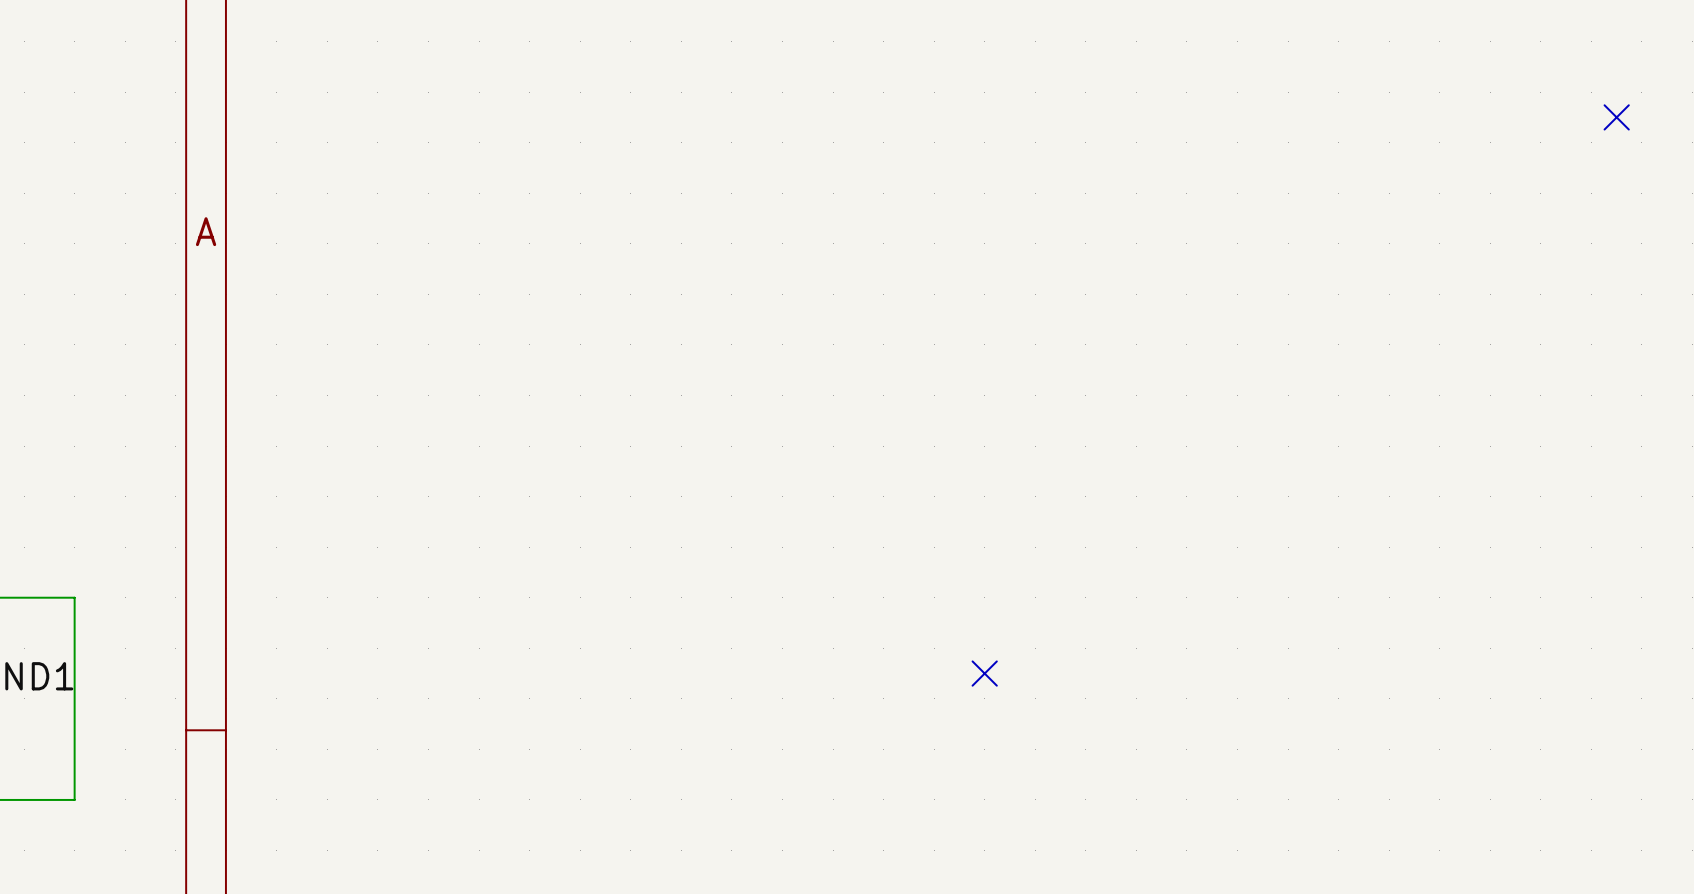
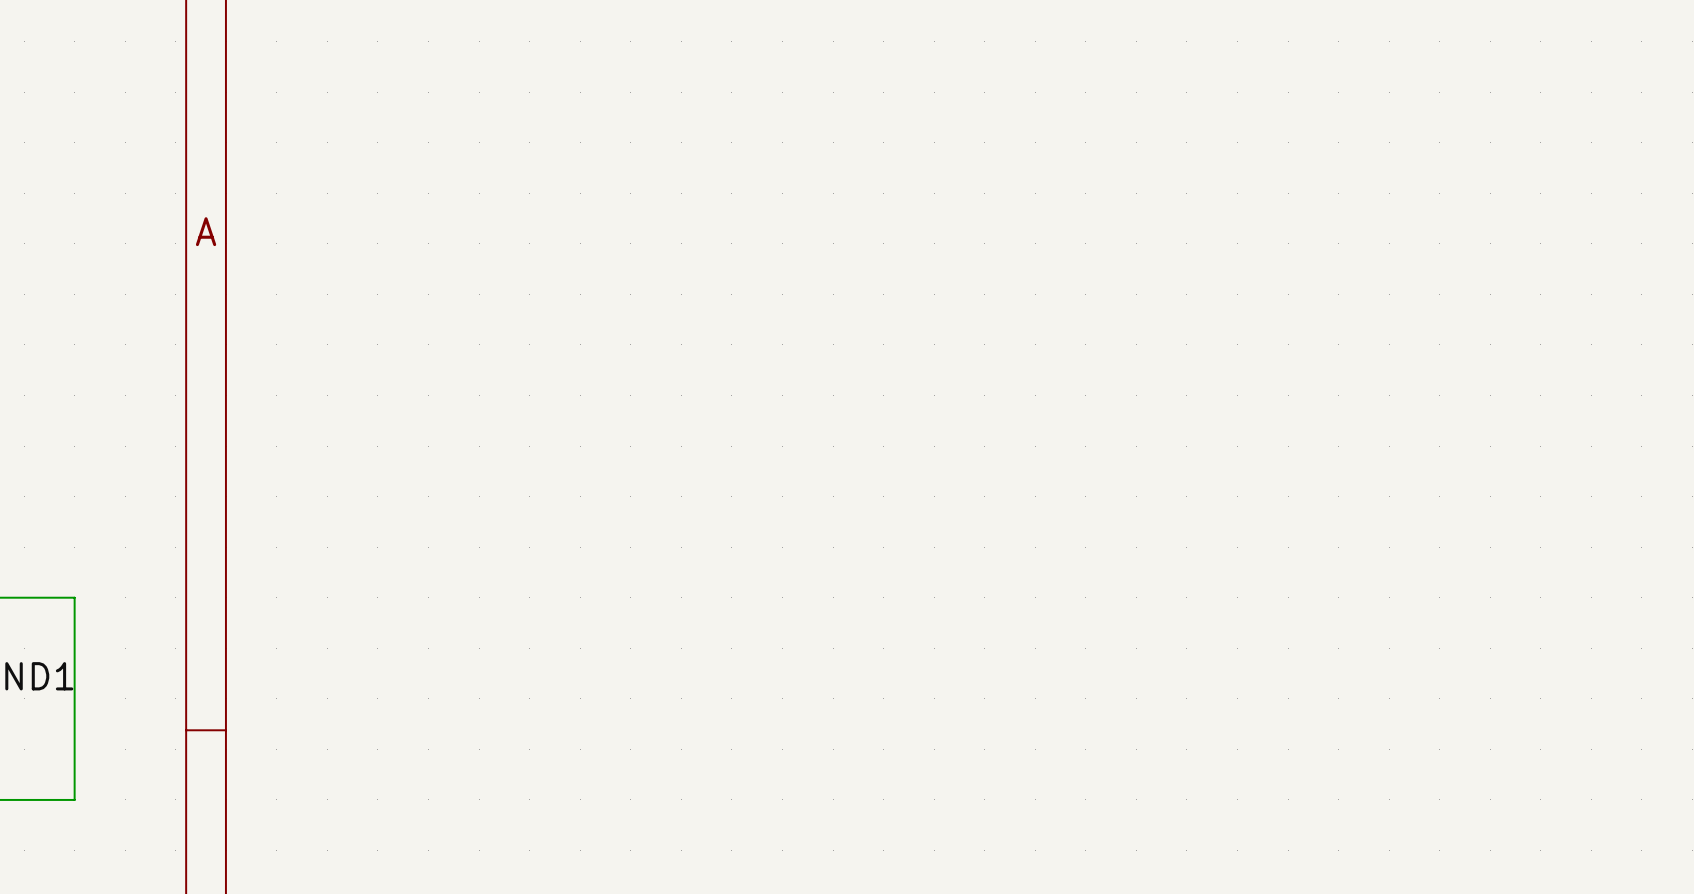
no-connect mark: (1616, 117) -> none
no-connect mark: (984, 673) -> none

